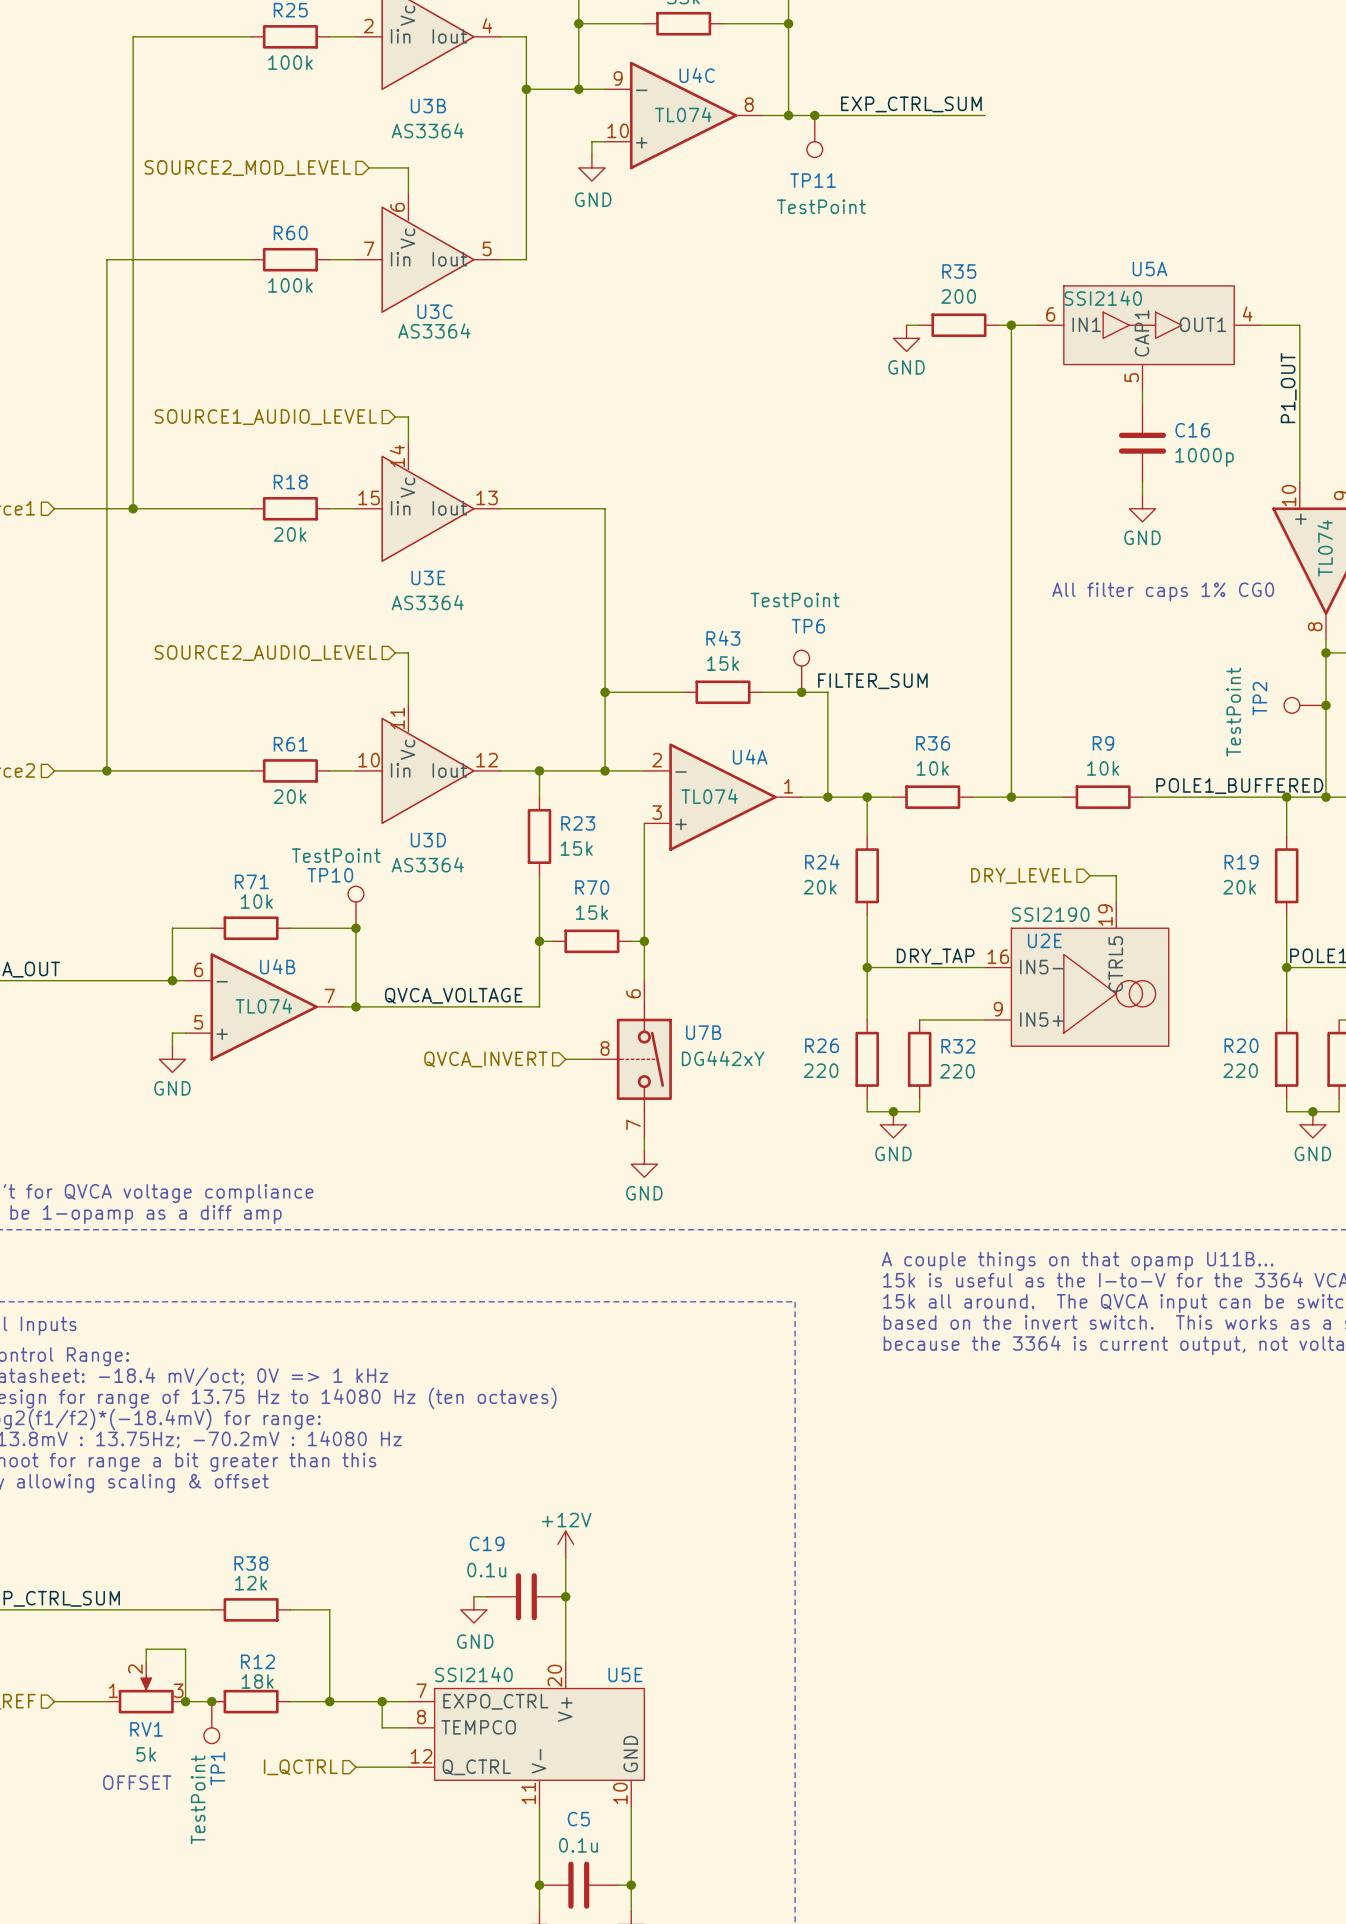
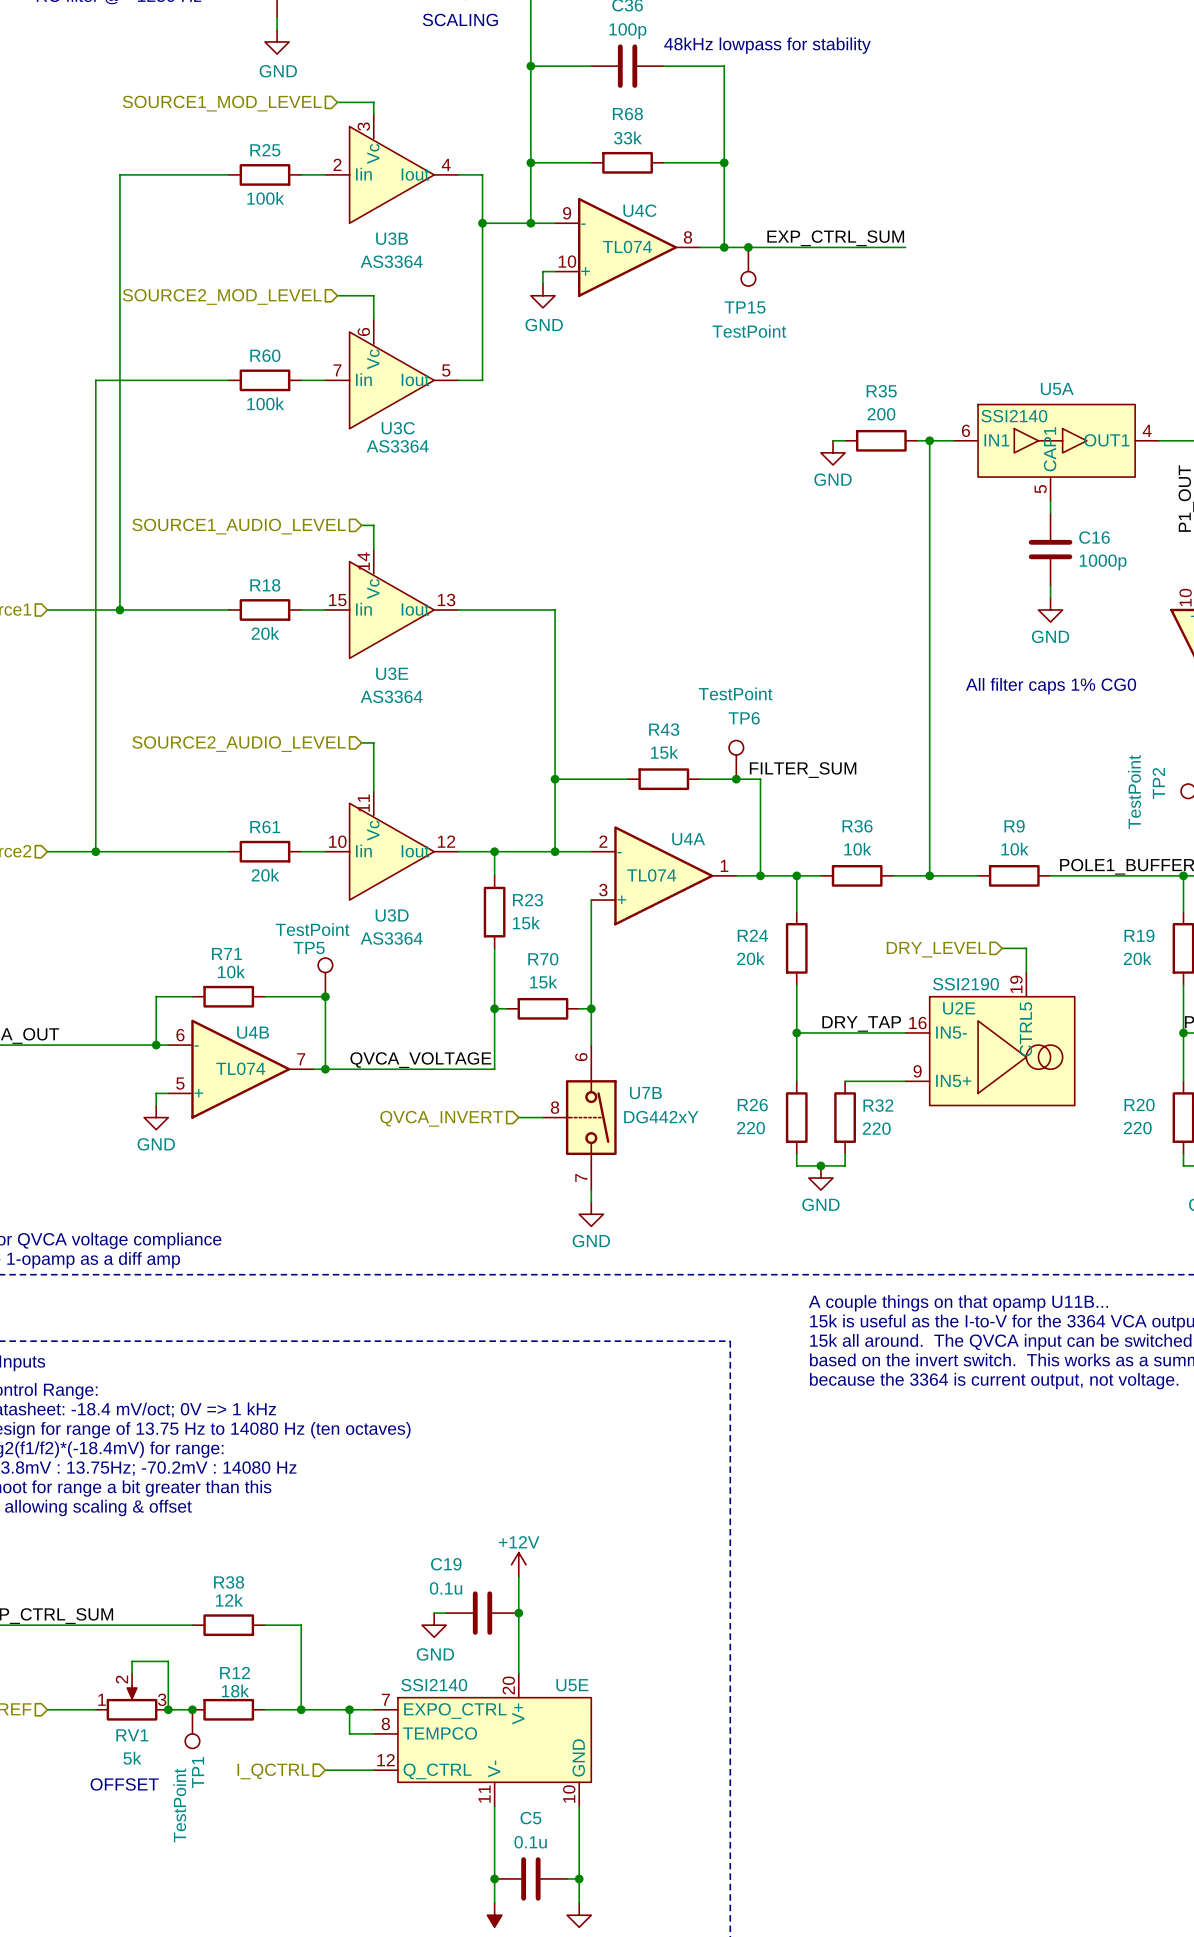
TP11 name: TP11 (812, 180) -> TP15 (745, 307)
TP10 name: TP10 (330, 875) -> TP5 (309, 948)

